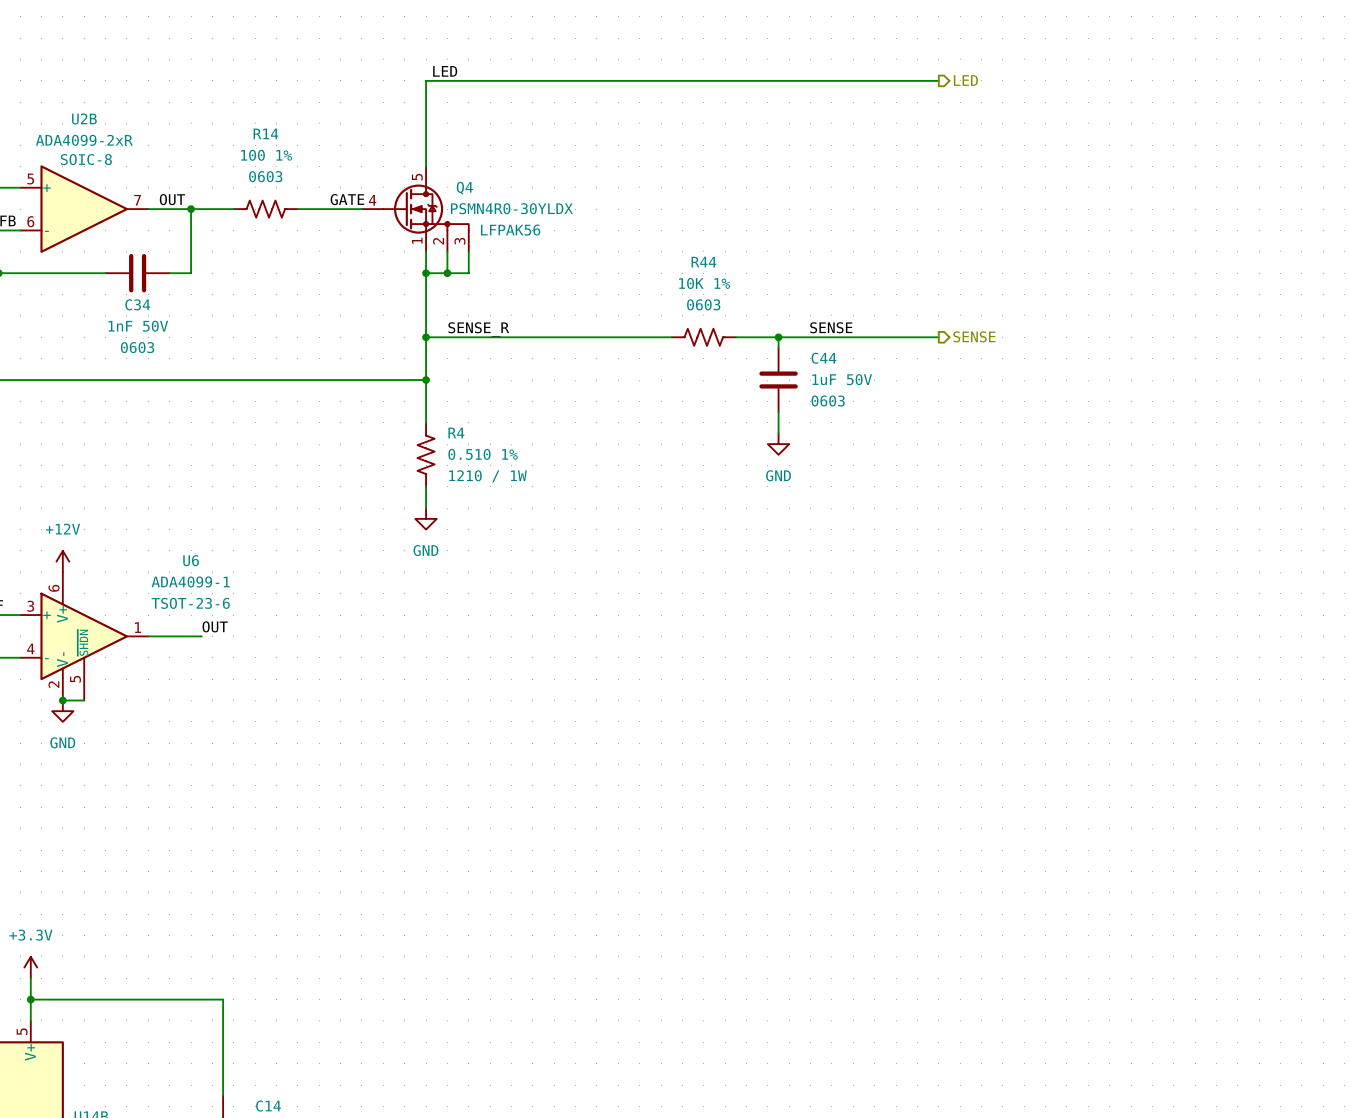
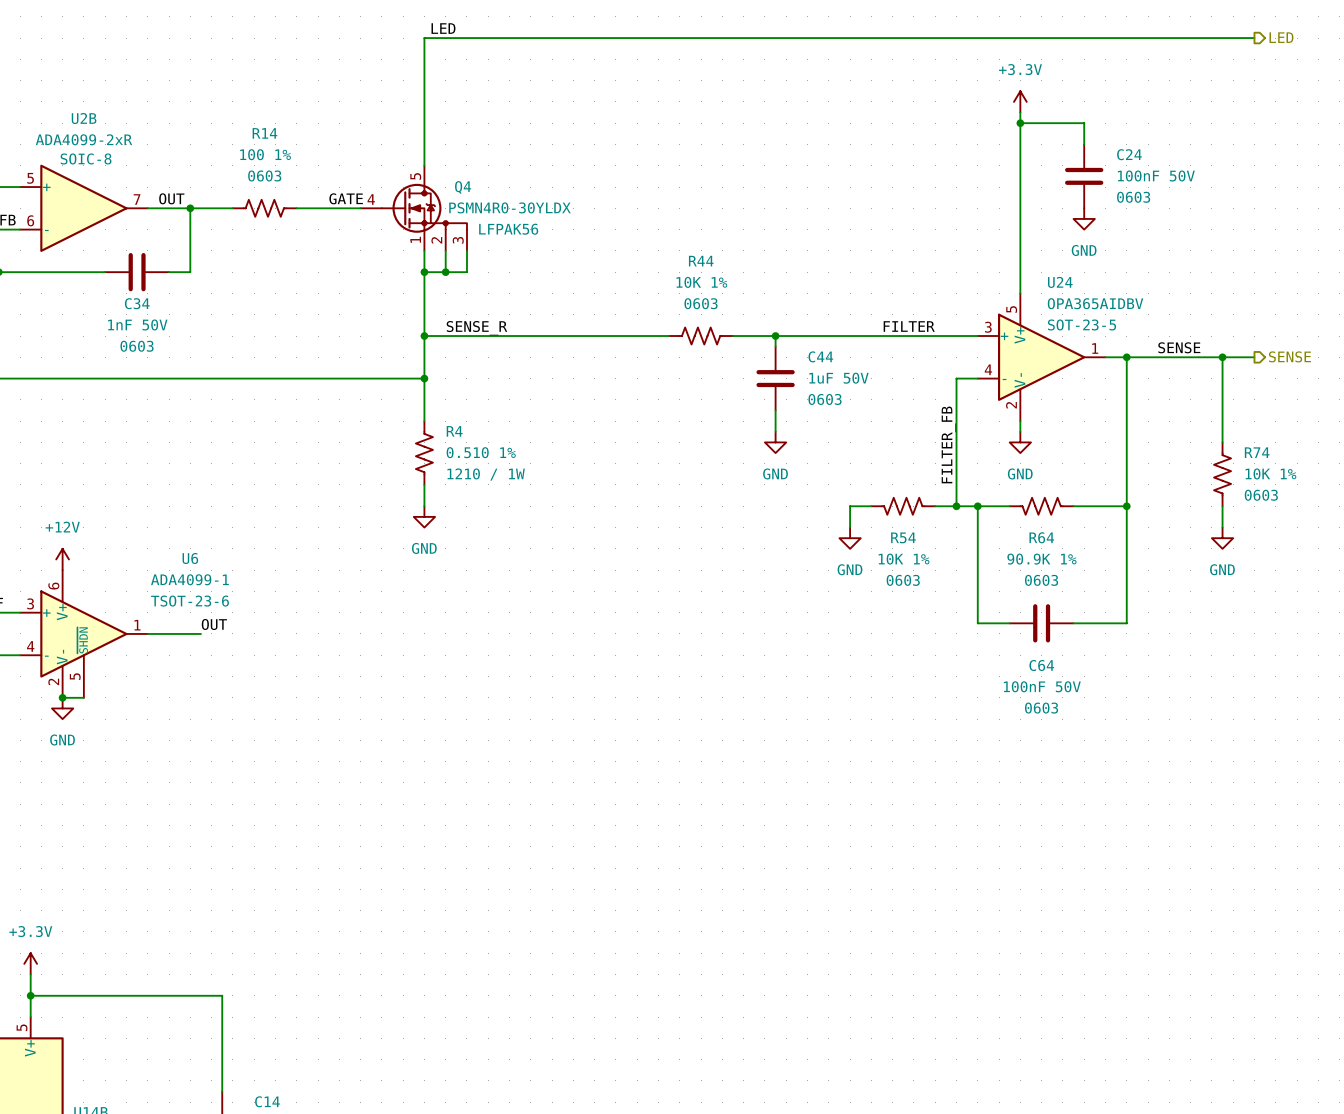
hierarchical label: none -> LED (1281, 37)
label position: LED (445, 71) -> LED (443, 28)
wire: (426, 80) (938, 80) -> (424, 80) (424, 38) (1254, 38)
hierarchical label: LED (965, 80) -> none
power symbol: none -> +3.3V (1020, 101)
wire: none -> (1020, 112) (1020, 293)
wire: none -> (1020, 123) (1084, 123) (1084, 144)
junction: none -> (1020, 123)
C24: none -> 100nF 50V (1084, 176)
power symbol: none -> GND (1084, 218)
label: SENSE (831, 327) -> none
label: none -> FILTER (909, 326)
hierarchical label: SENSE (974, 336) -> none
wire: none -> (935, 336) (977, 336)
label: none -> SENSE (1179, 347)
U24: none -> OPA365AIDBV (1041, 357)
wire: none -> (1105, 357) (1254, 357)
wire: none -> (1126, 357) (1126, 623) (1073, 623)
junction: none -> (1126, 357)
wire: none -> (1222, 357) (1222, 442)
junction: none -> (1222, 357)
hierarchical label: none -> SENSE (1289, 356)
wire: none -> (977, 378) (956, 378) (956, 506)
wire: none -> (1020, 421) (1020, 431)
power symbol: none -> GND (1020, 442)
label: none -> FILTER_FB (948, 444)
R74: none -> 10K 1% (1222, 474)
wire: none -> (871, 506) (850, 506) (850, 527)
R54: none -> 10K 1% (903, 506)
wire: none -> (935, 506) (1009, 506)
junction: none -> (956, 506)
wire: none -> (977, 506) (977, 623) (1009, 623)
junction: none -> (977, 506)
R64: none -> 90.9K 1% (1041, 506)
wire: none -> (1073, 506) (1126, 506)
junction: none -> (1126, 506)
wire: none -> (1222, 506) (1222, 527)
power symbol: none -> GND (850, 538)
power symbol: none -> GND (1222, 538)
C64: none -> 100nF 50V (1041, 623)

